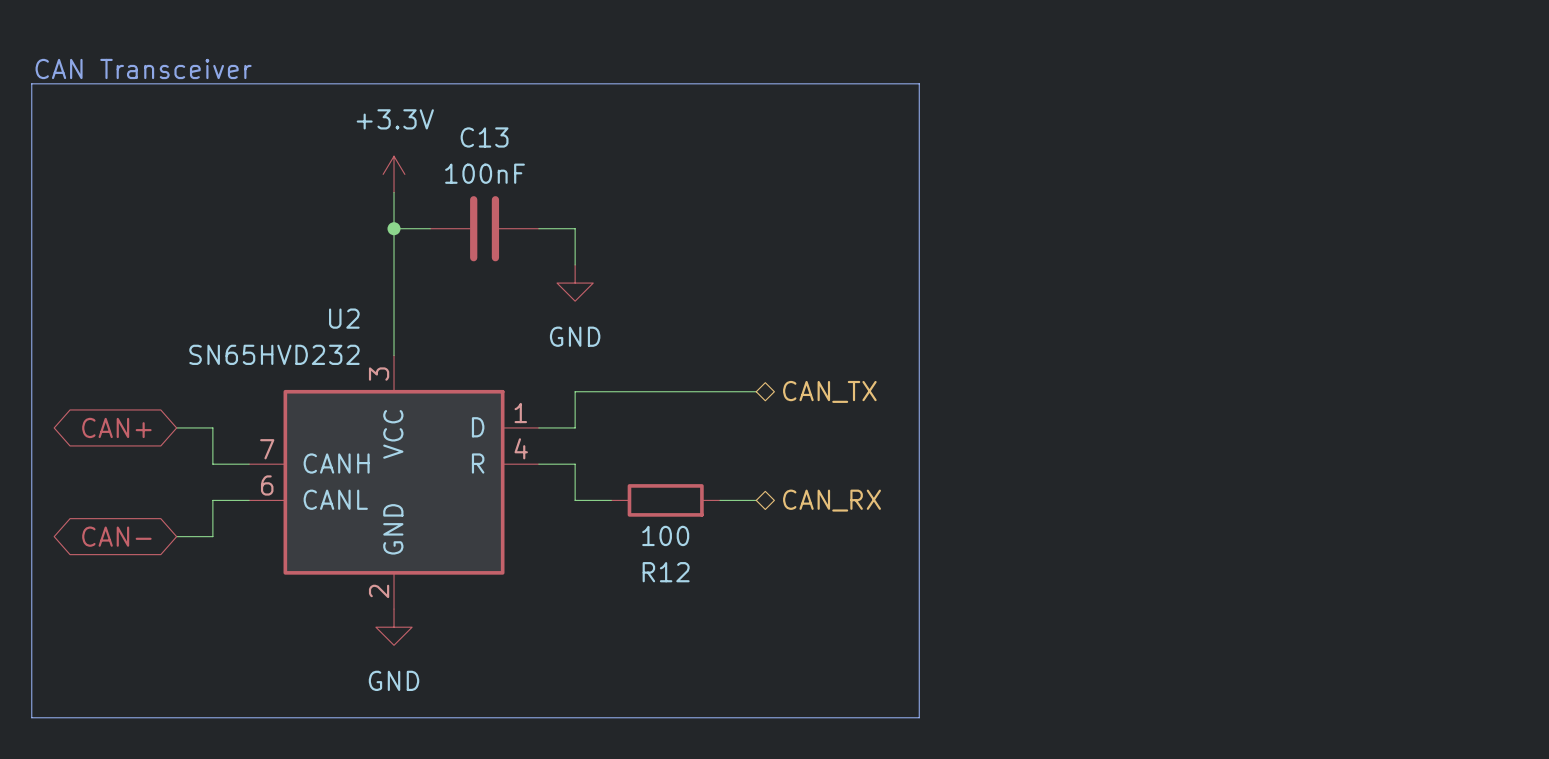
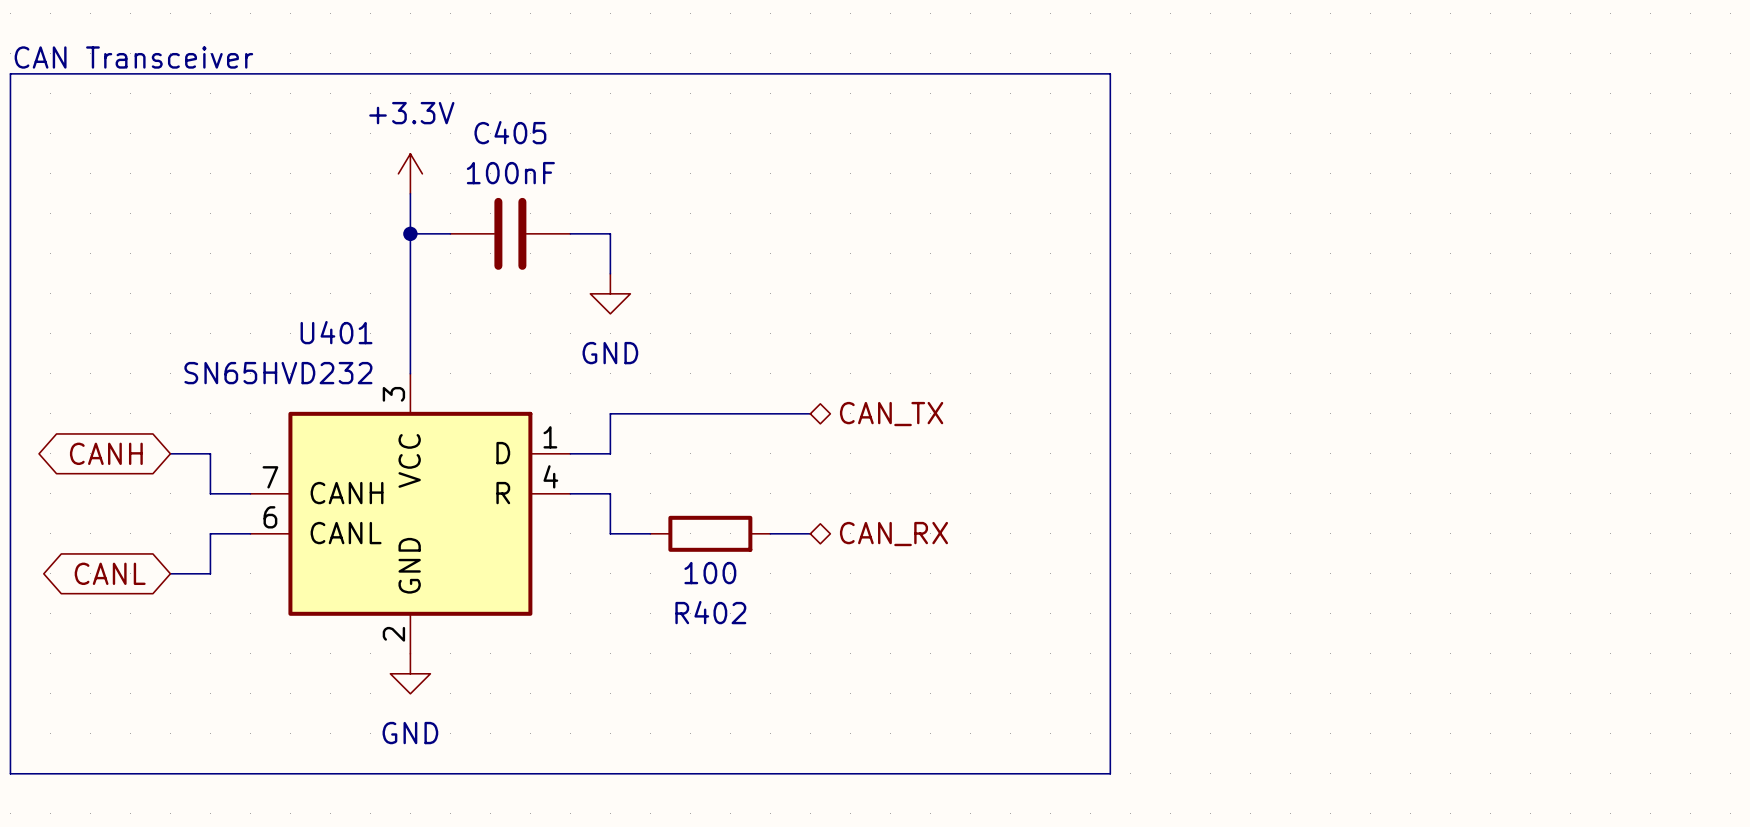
line: (919, 83) (919, 717) -> (990, 73) (1110, 73) (1110, 773) (990, 773)
C13 name: C13 (484, 137) -> C405 (510, 132)
U2 name: U2 (344, 318) -> U401 (336, 332)
global label: CAN+ (116, 427) -> CANH (106, 453)
global label: CAN- (116, 536) -> CANL (110, 573)
R12 name: R12 (666, 572) -> R402 (710, 612)

